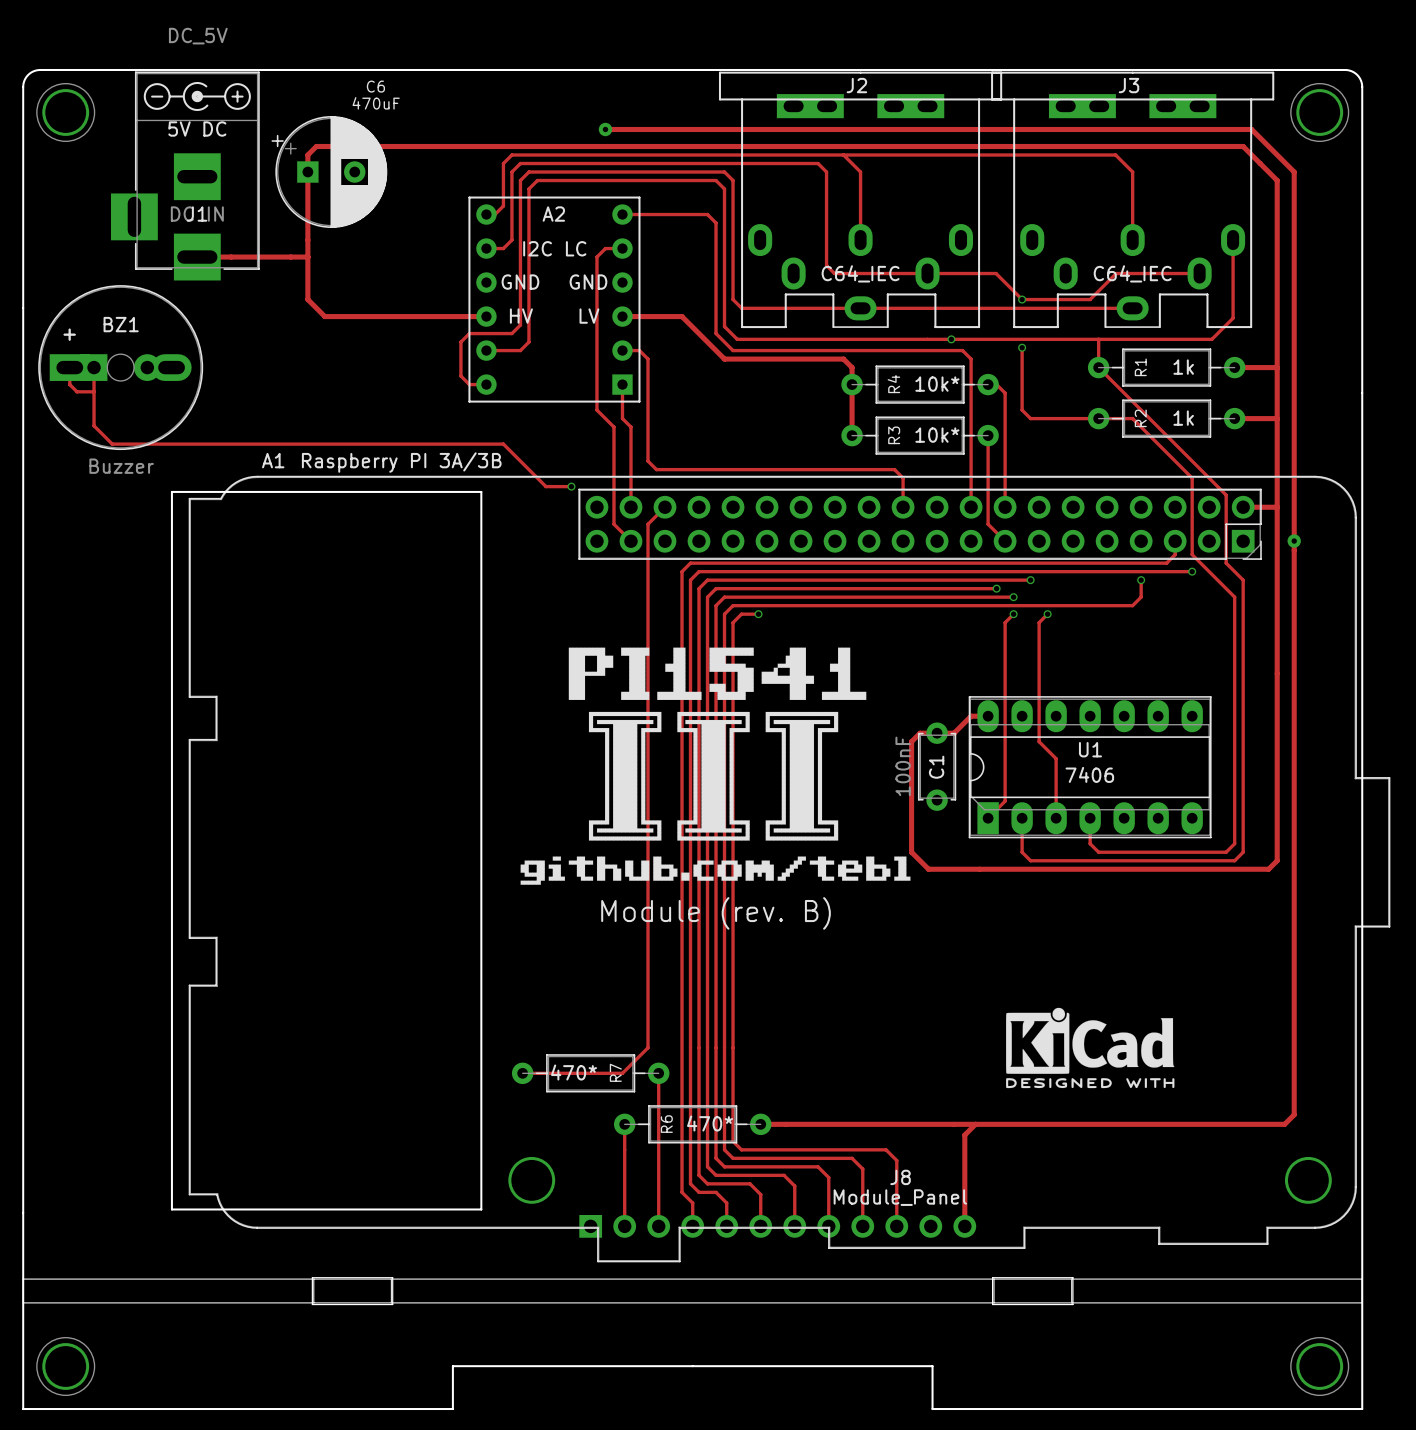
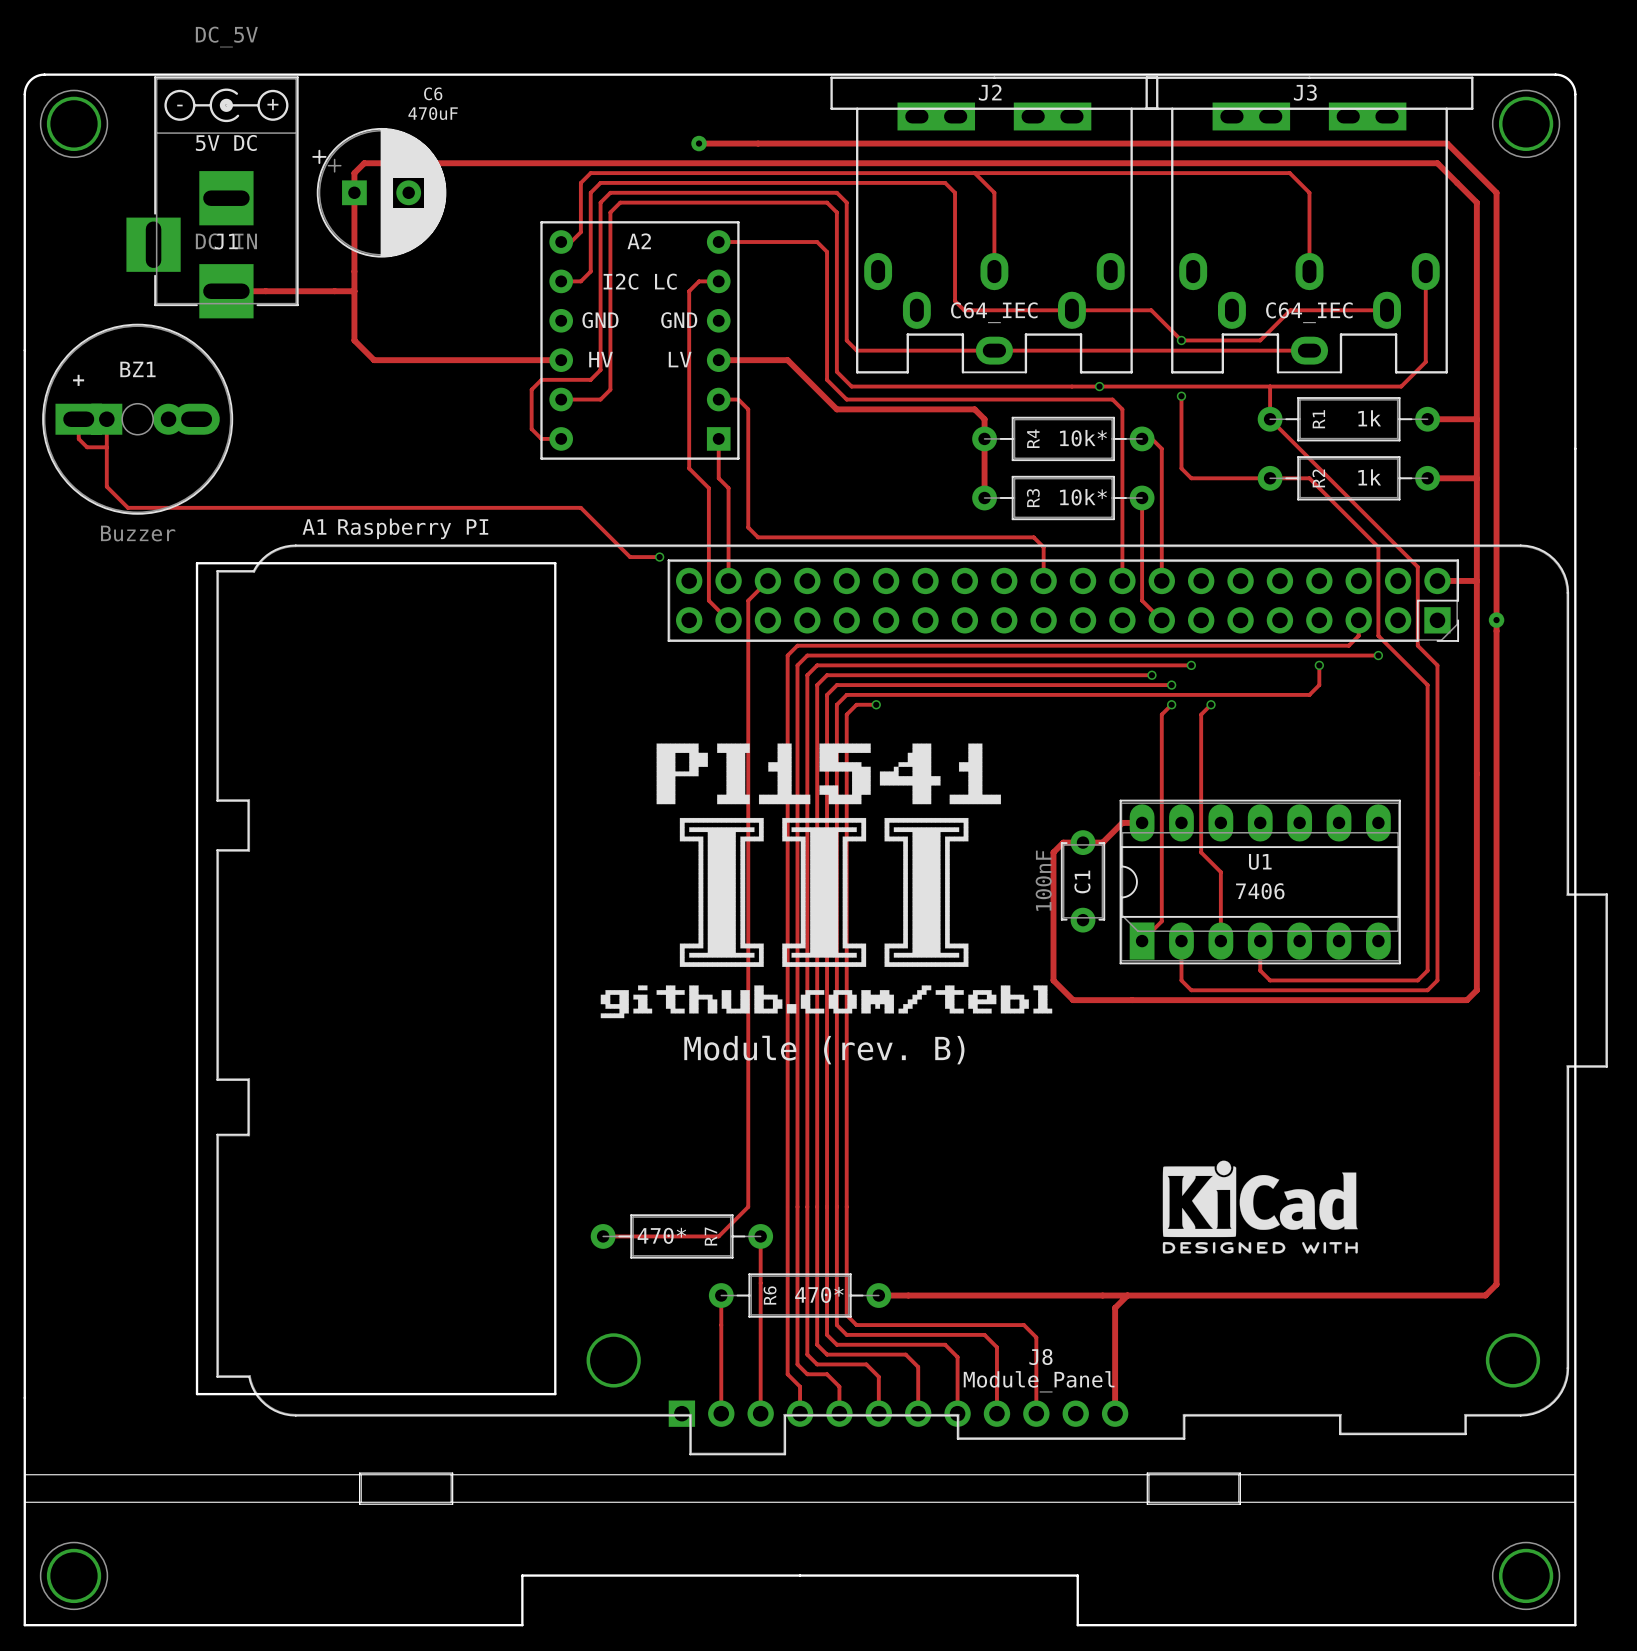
A1 value: Raspberry PI 3A/3B (401, 462) -> Raspberry PI (413, 528)

